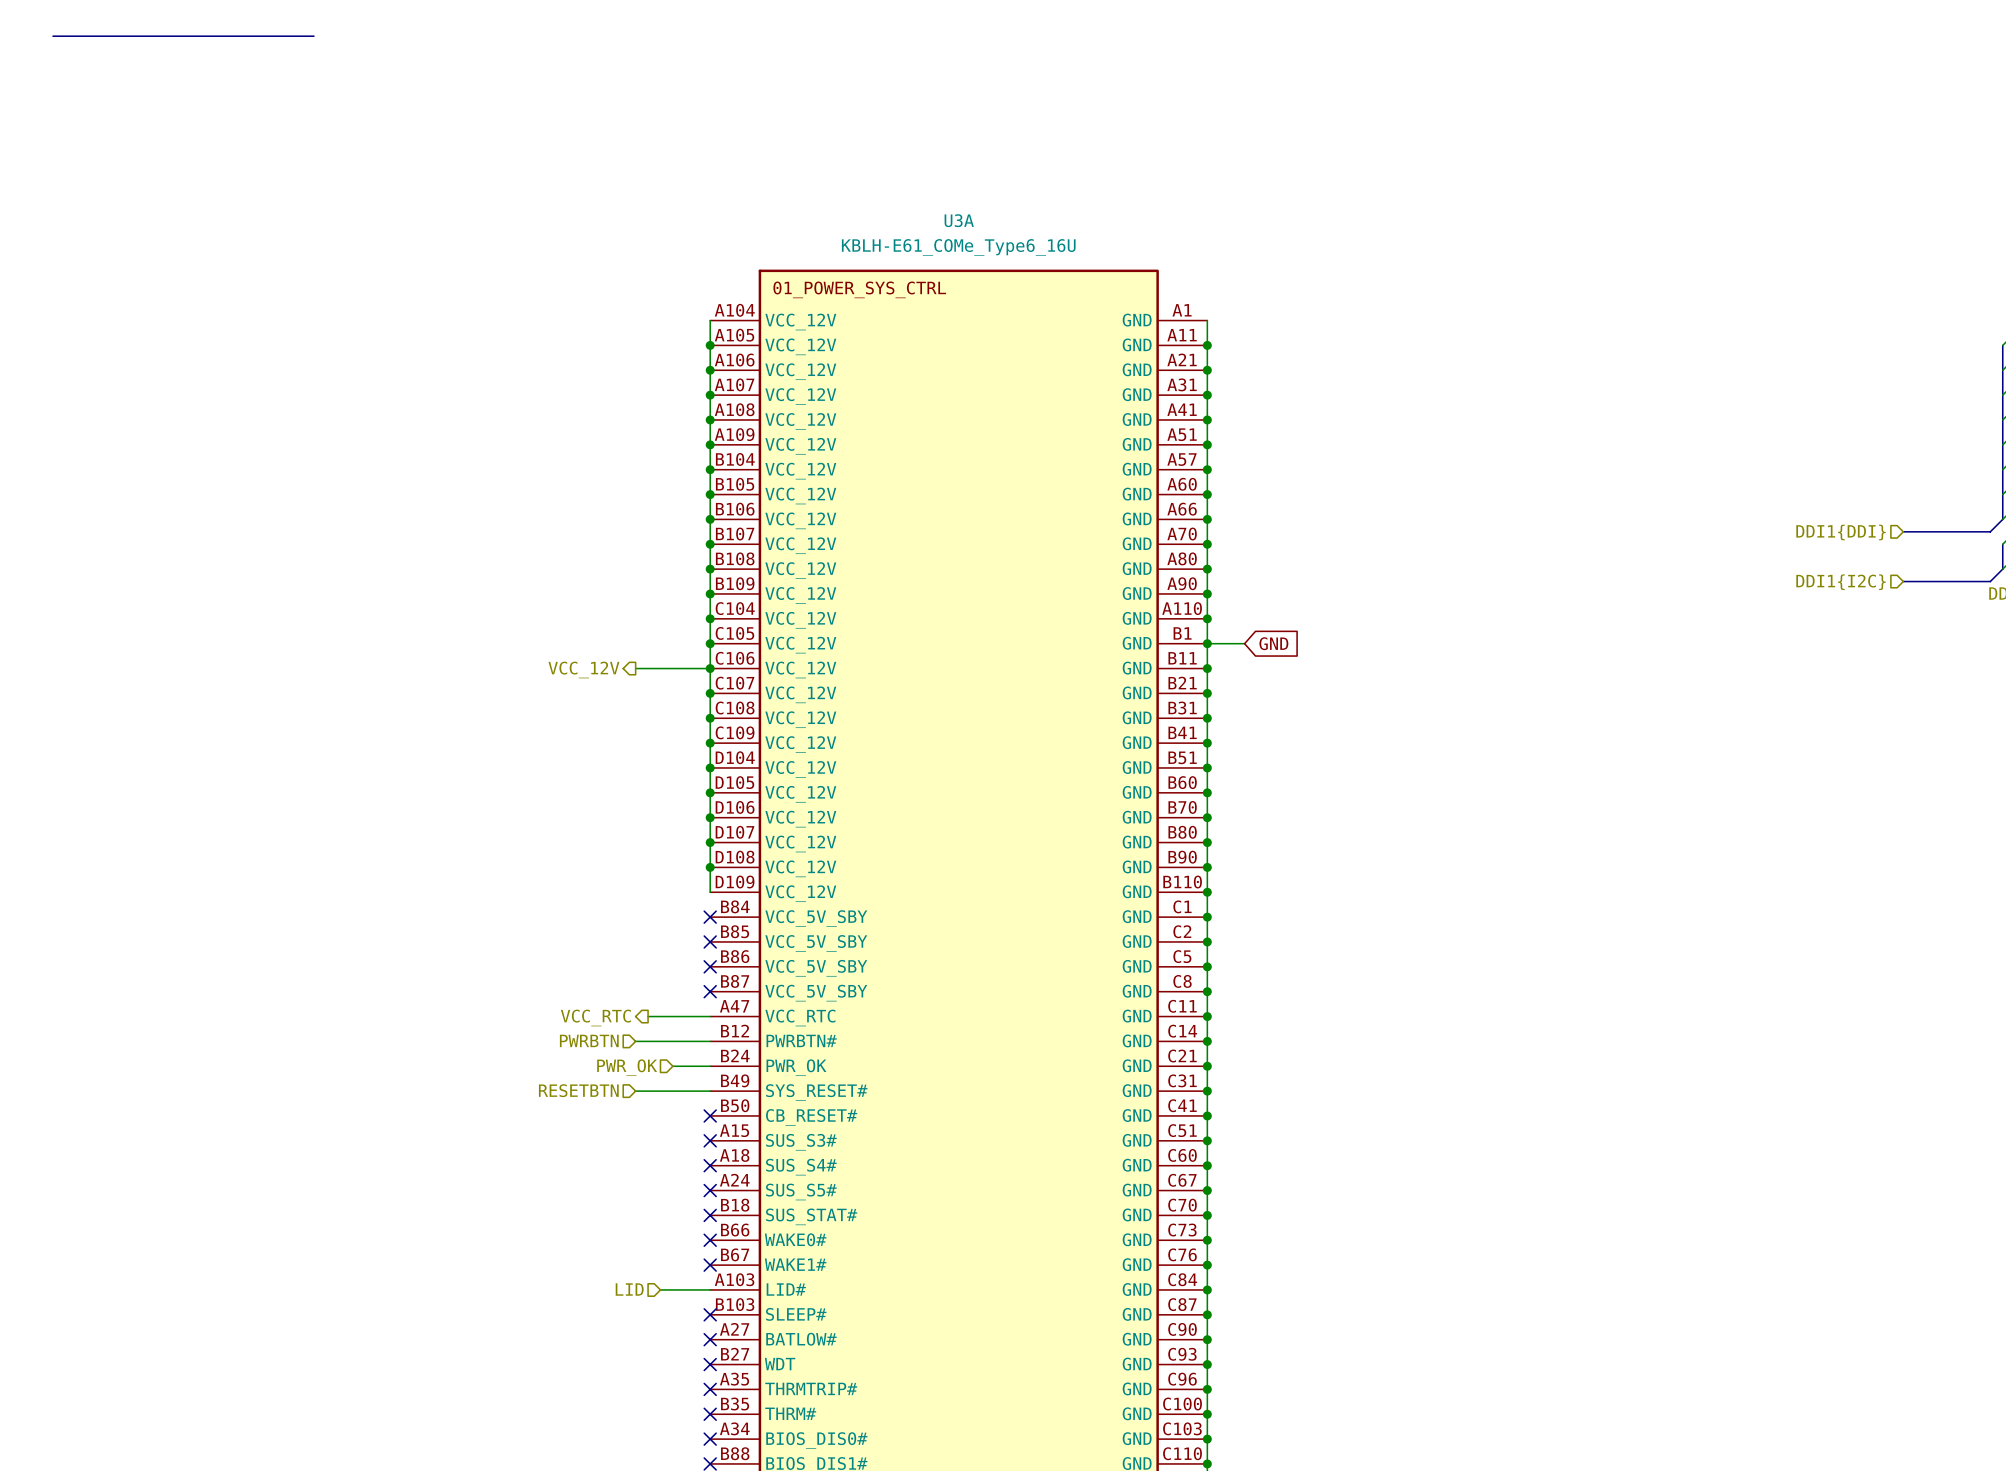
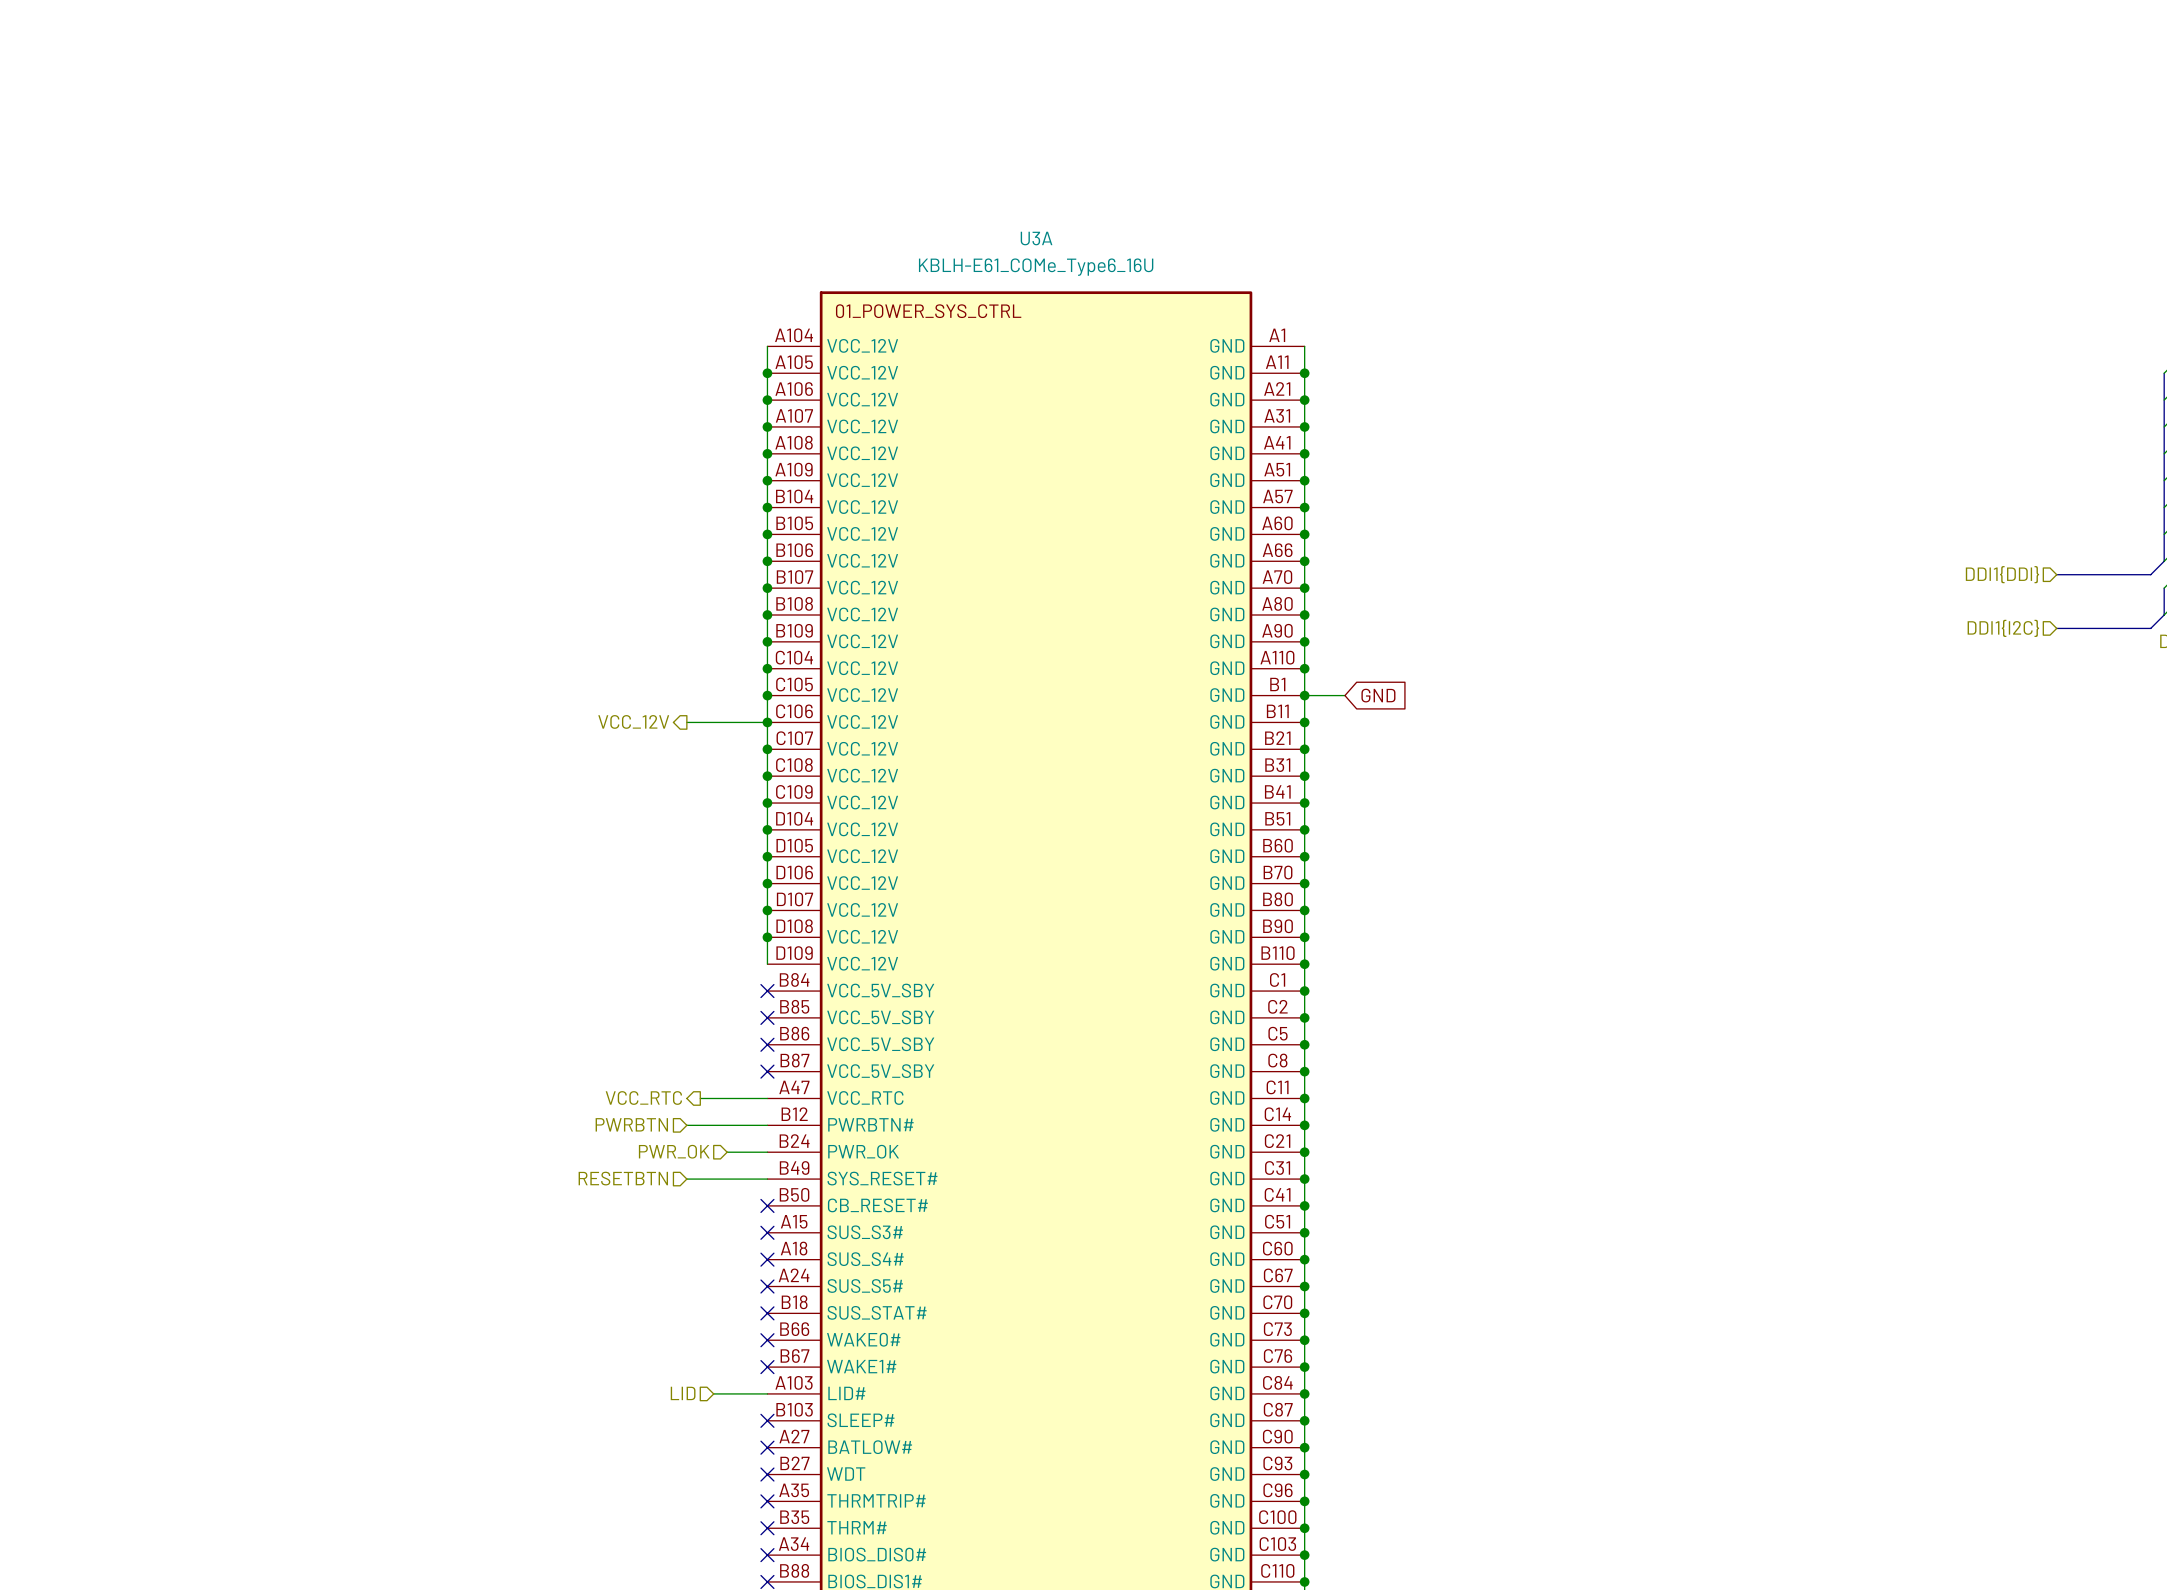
bus: (52, 36) (313, 36) -> none

